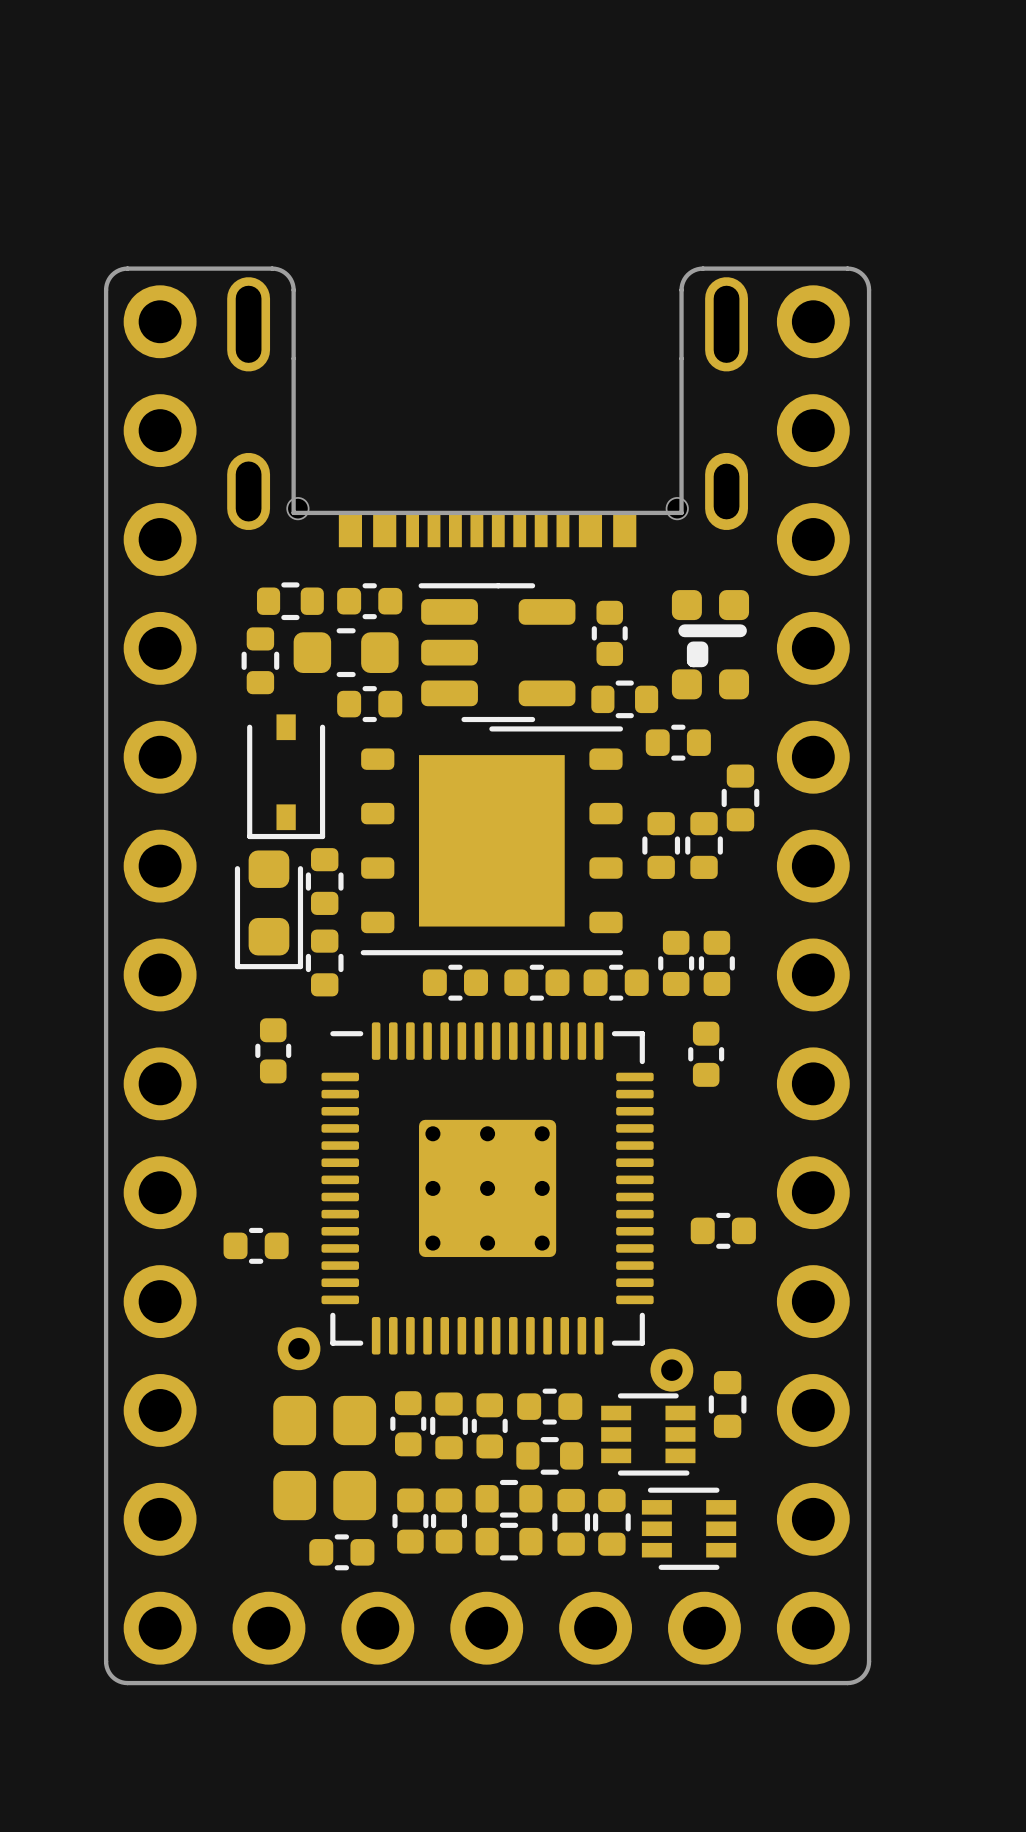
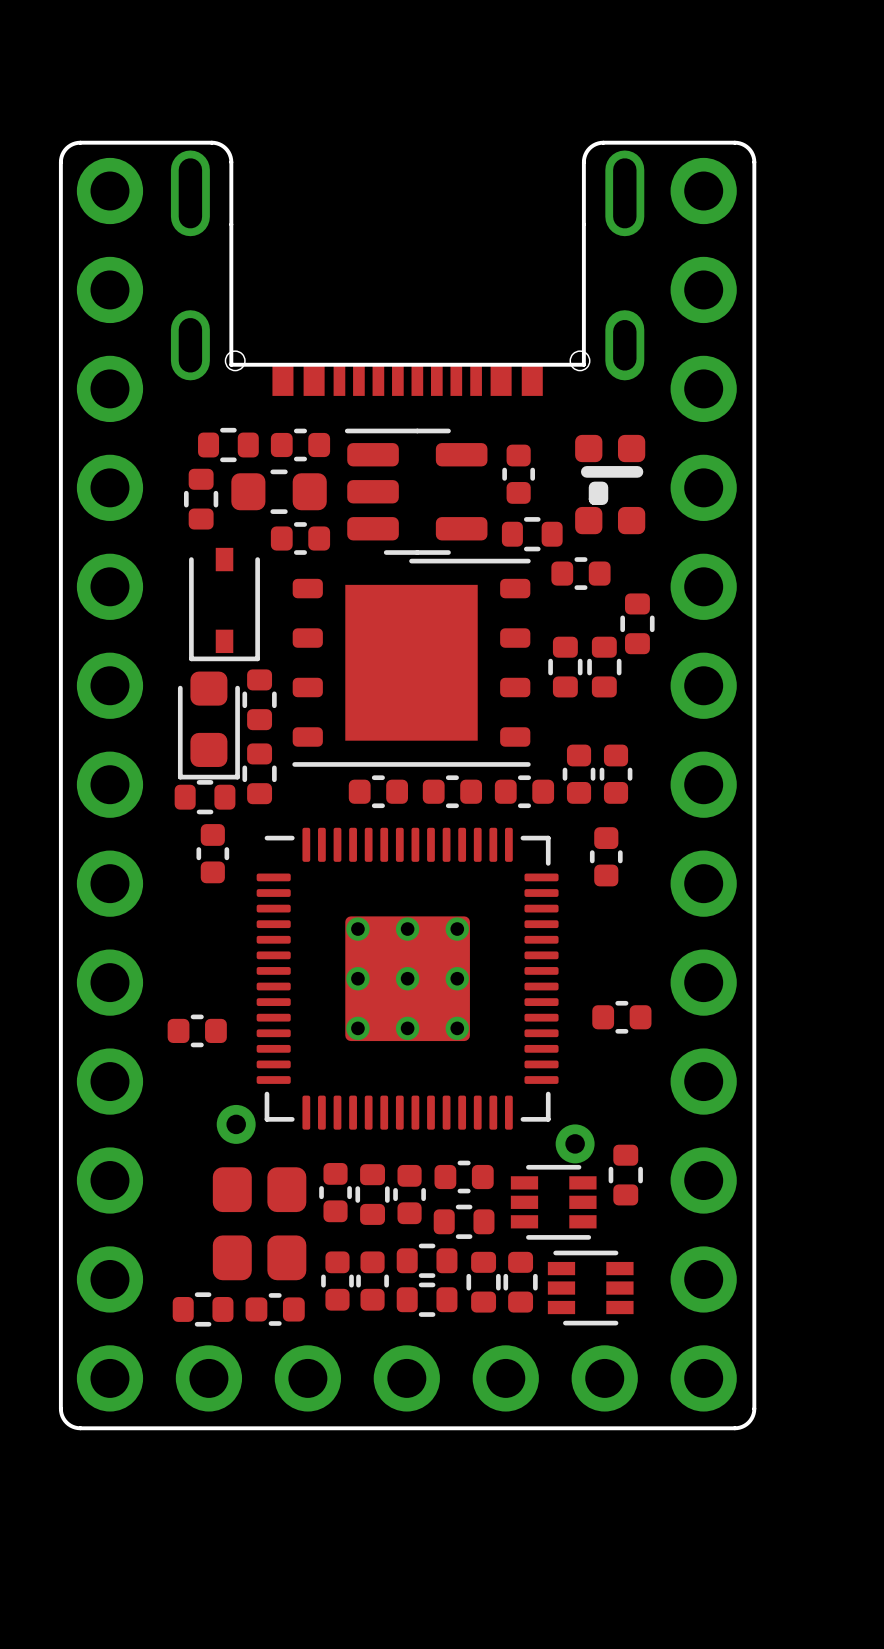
part: none -> (205, 797)
part: none -> (203, 1309)

